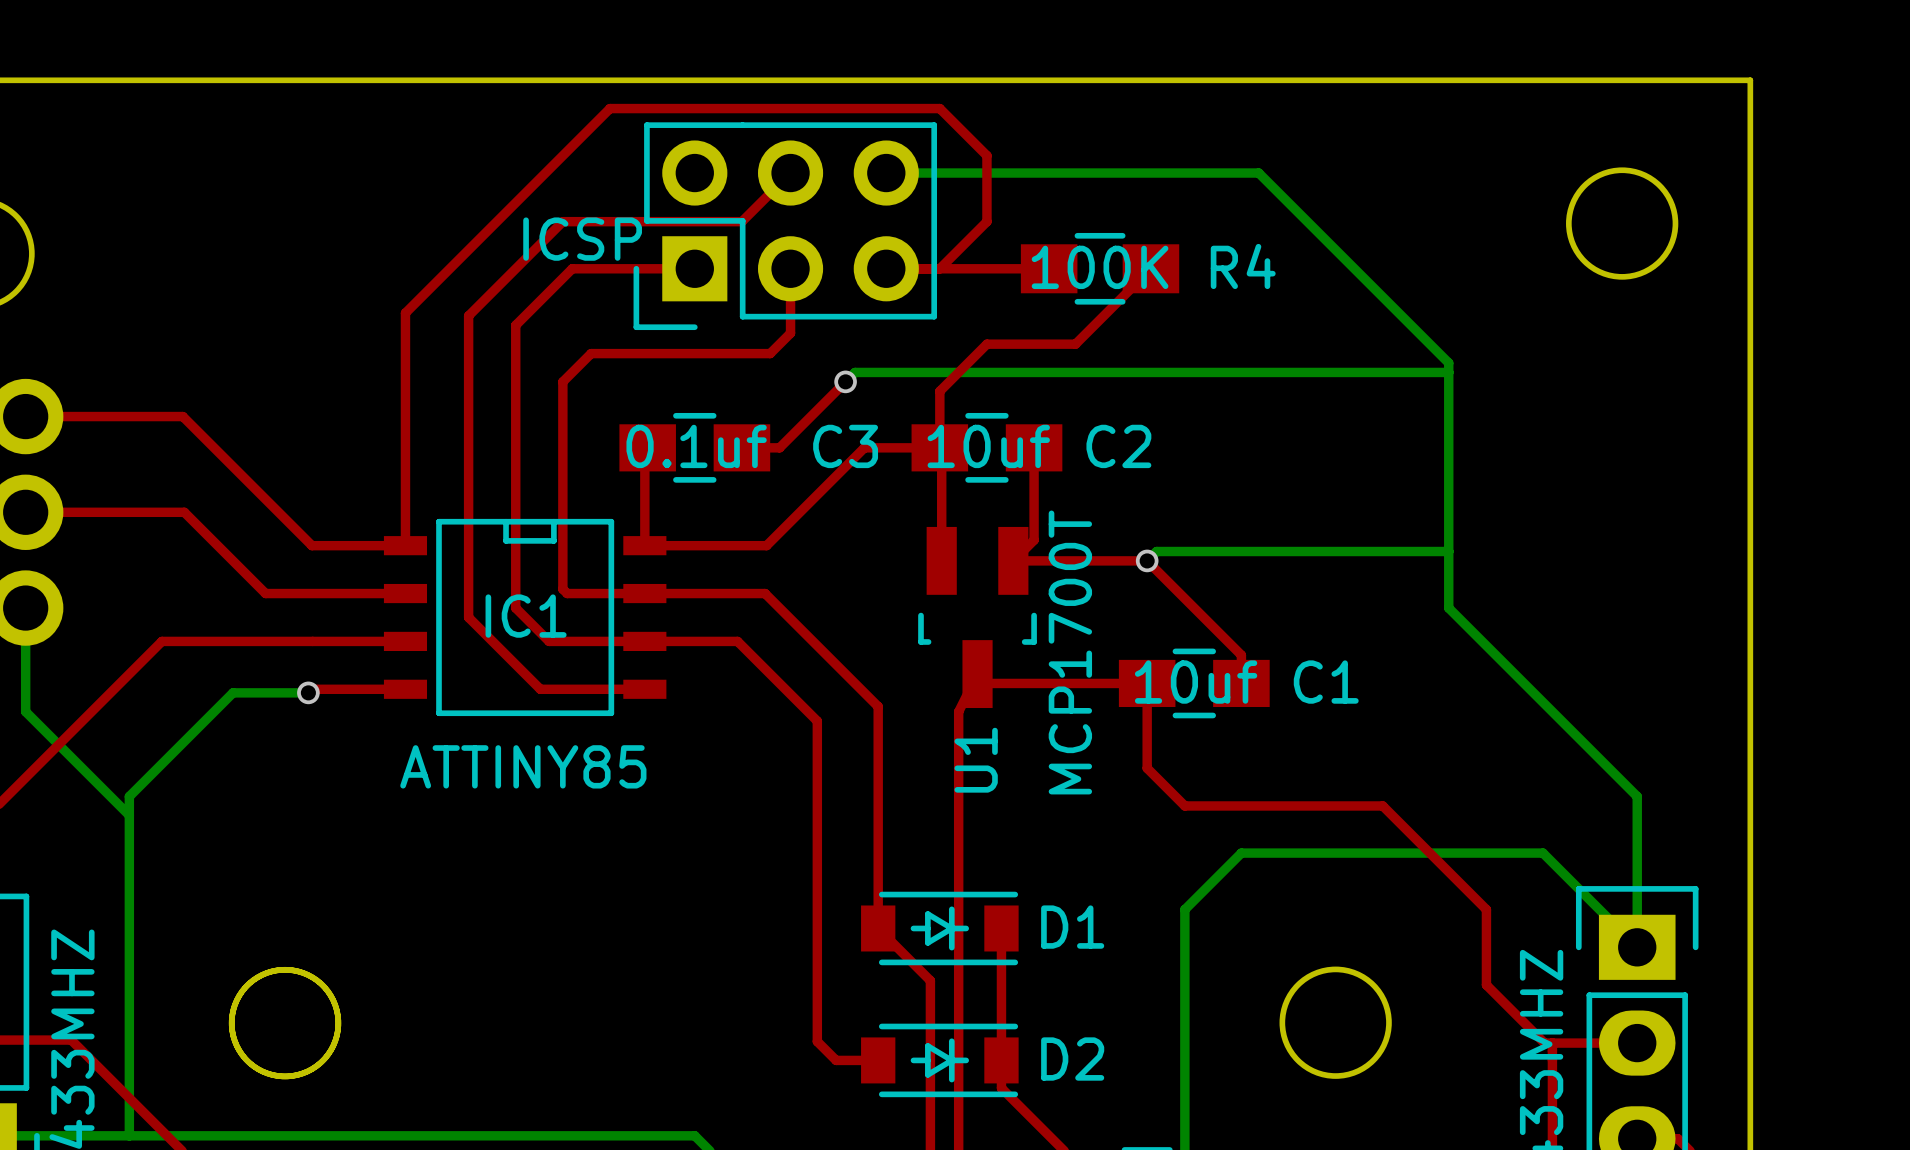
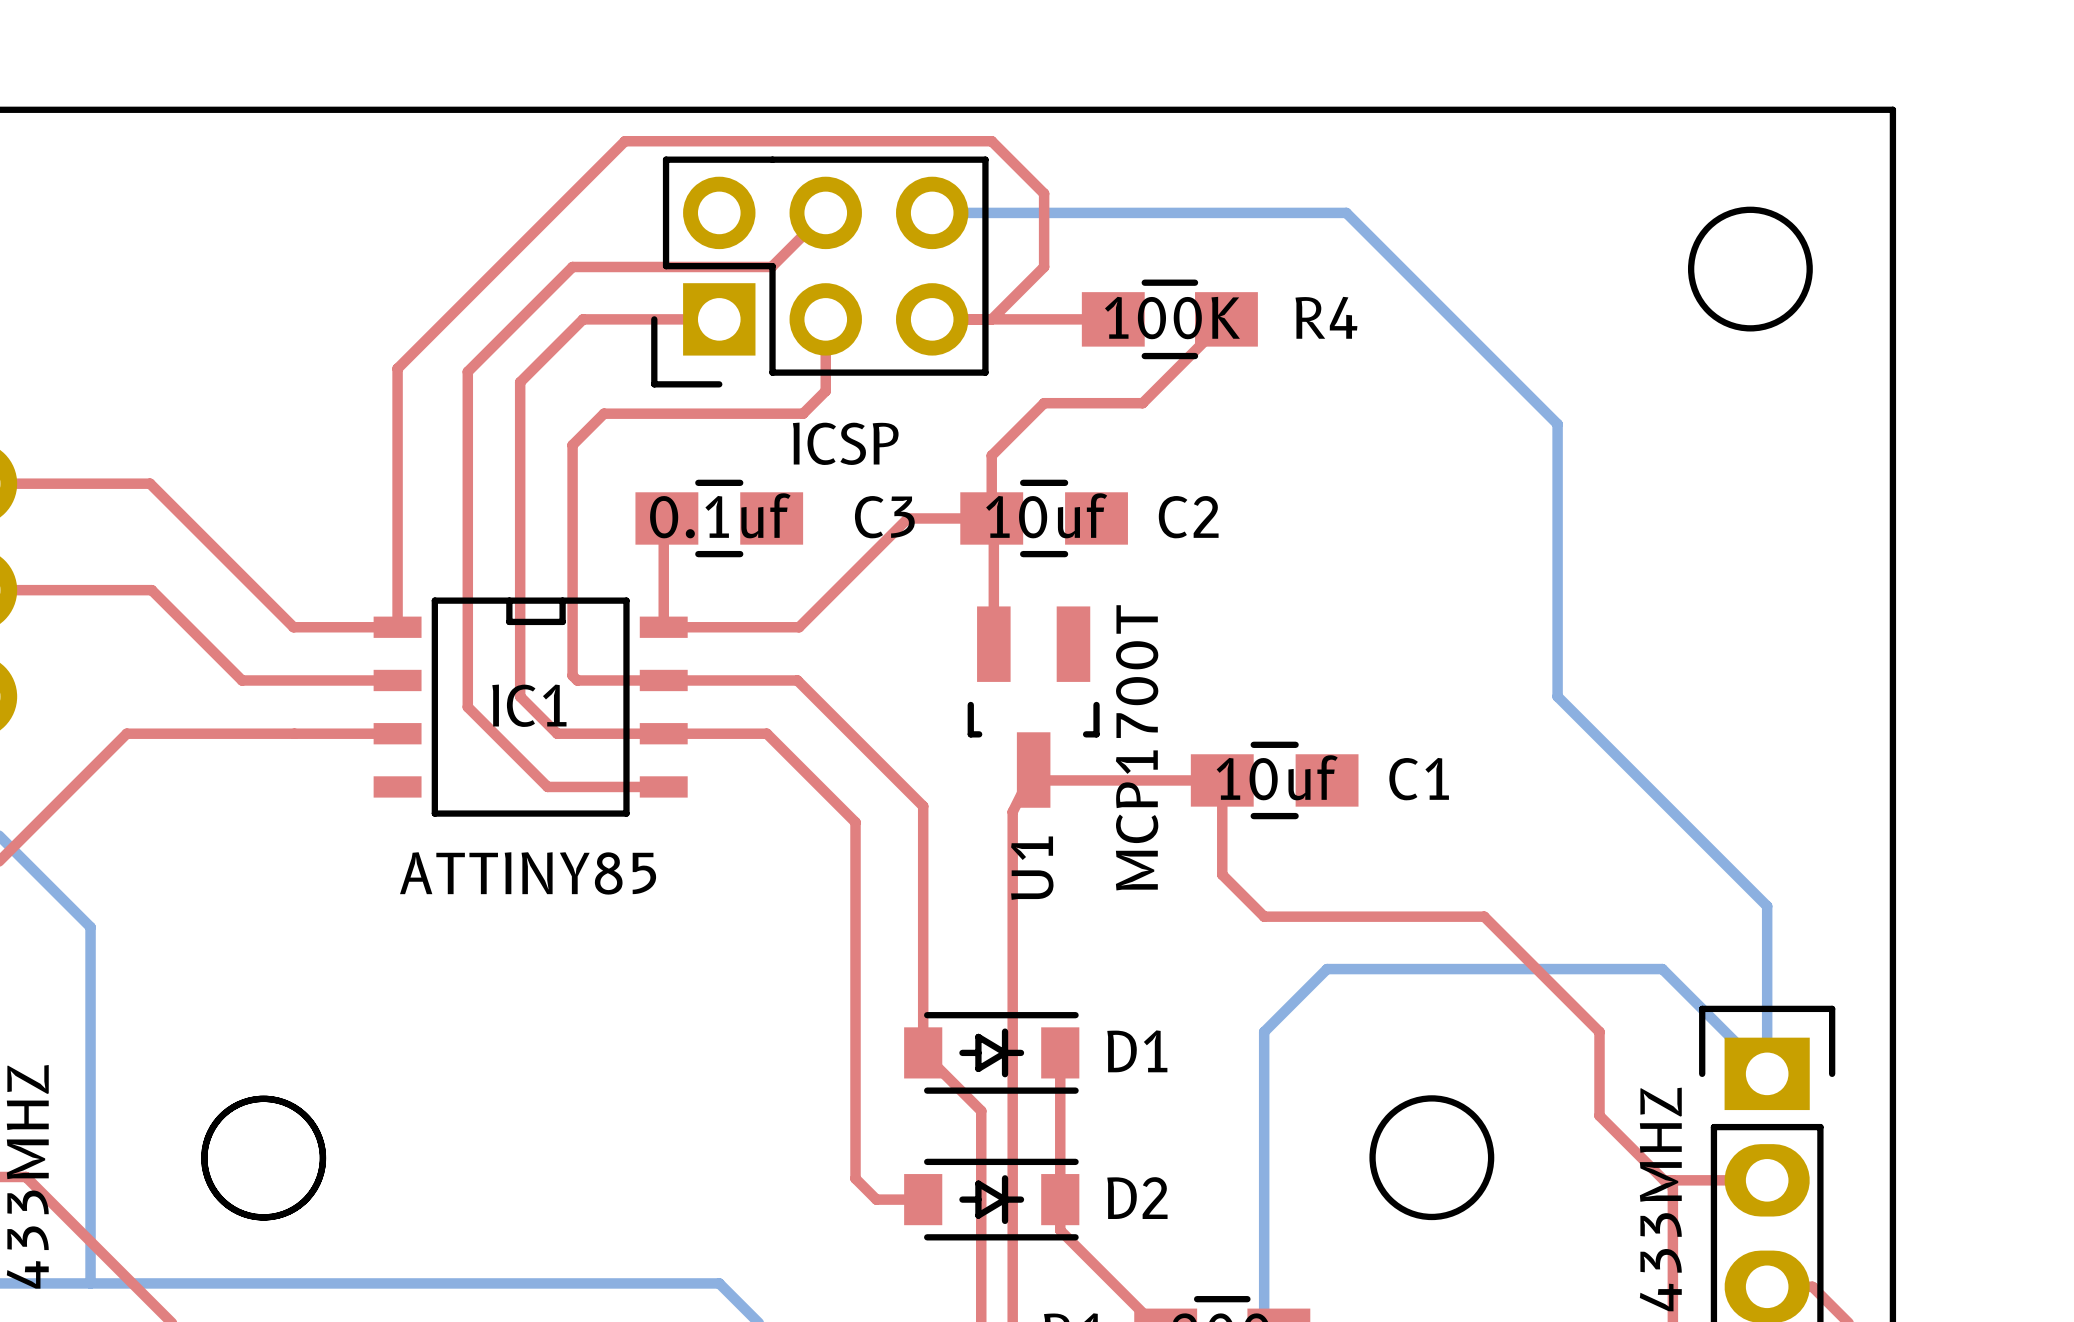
part value position: ICSP (582, 239) -> ICSP (845, 443)
bottom track: (1448, 372) (855, 372) (845, 381) -> none
top track: (845, 381) (779, 447) (741, 447) -> none
via: (845, 381) -> none
top track: (1034, 447) (1034, 540) (1013, 560) (1147, 560) (1241, 655) (1241, 683) -> none
bottom track: (1448, 551) (1156, 551) (1147, 560) -> none
via: (1147, 560) -> none
top track: (405, 689) (311, 689) (308, 692) -> none
bottom track: (308, 692) (233, 692) (129, 796) (129, 815) -> none
via: (308, 692) -> none

